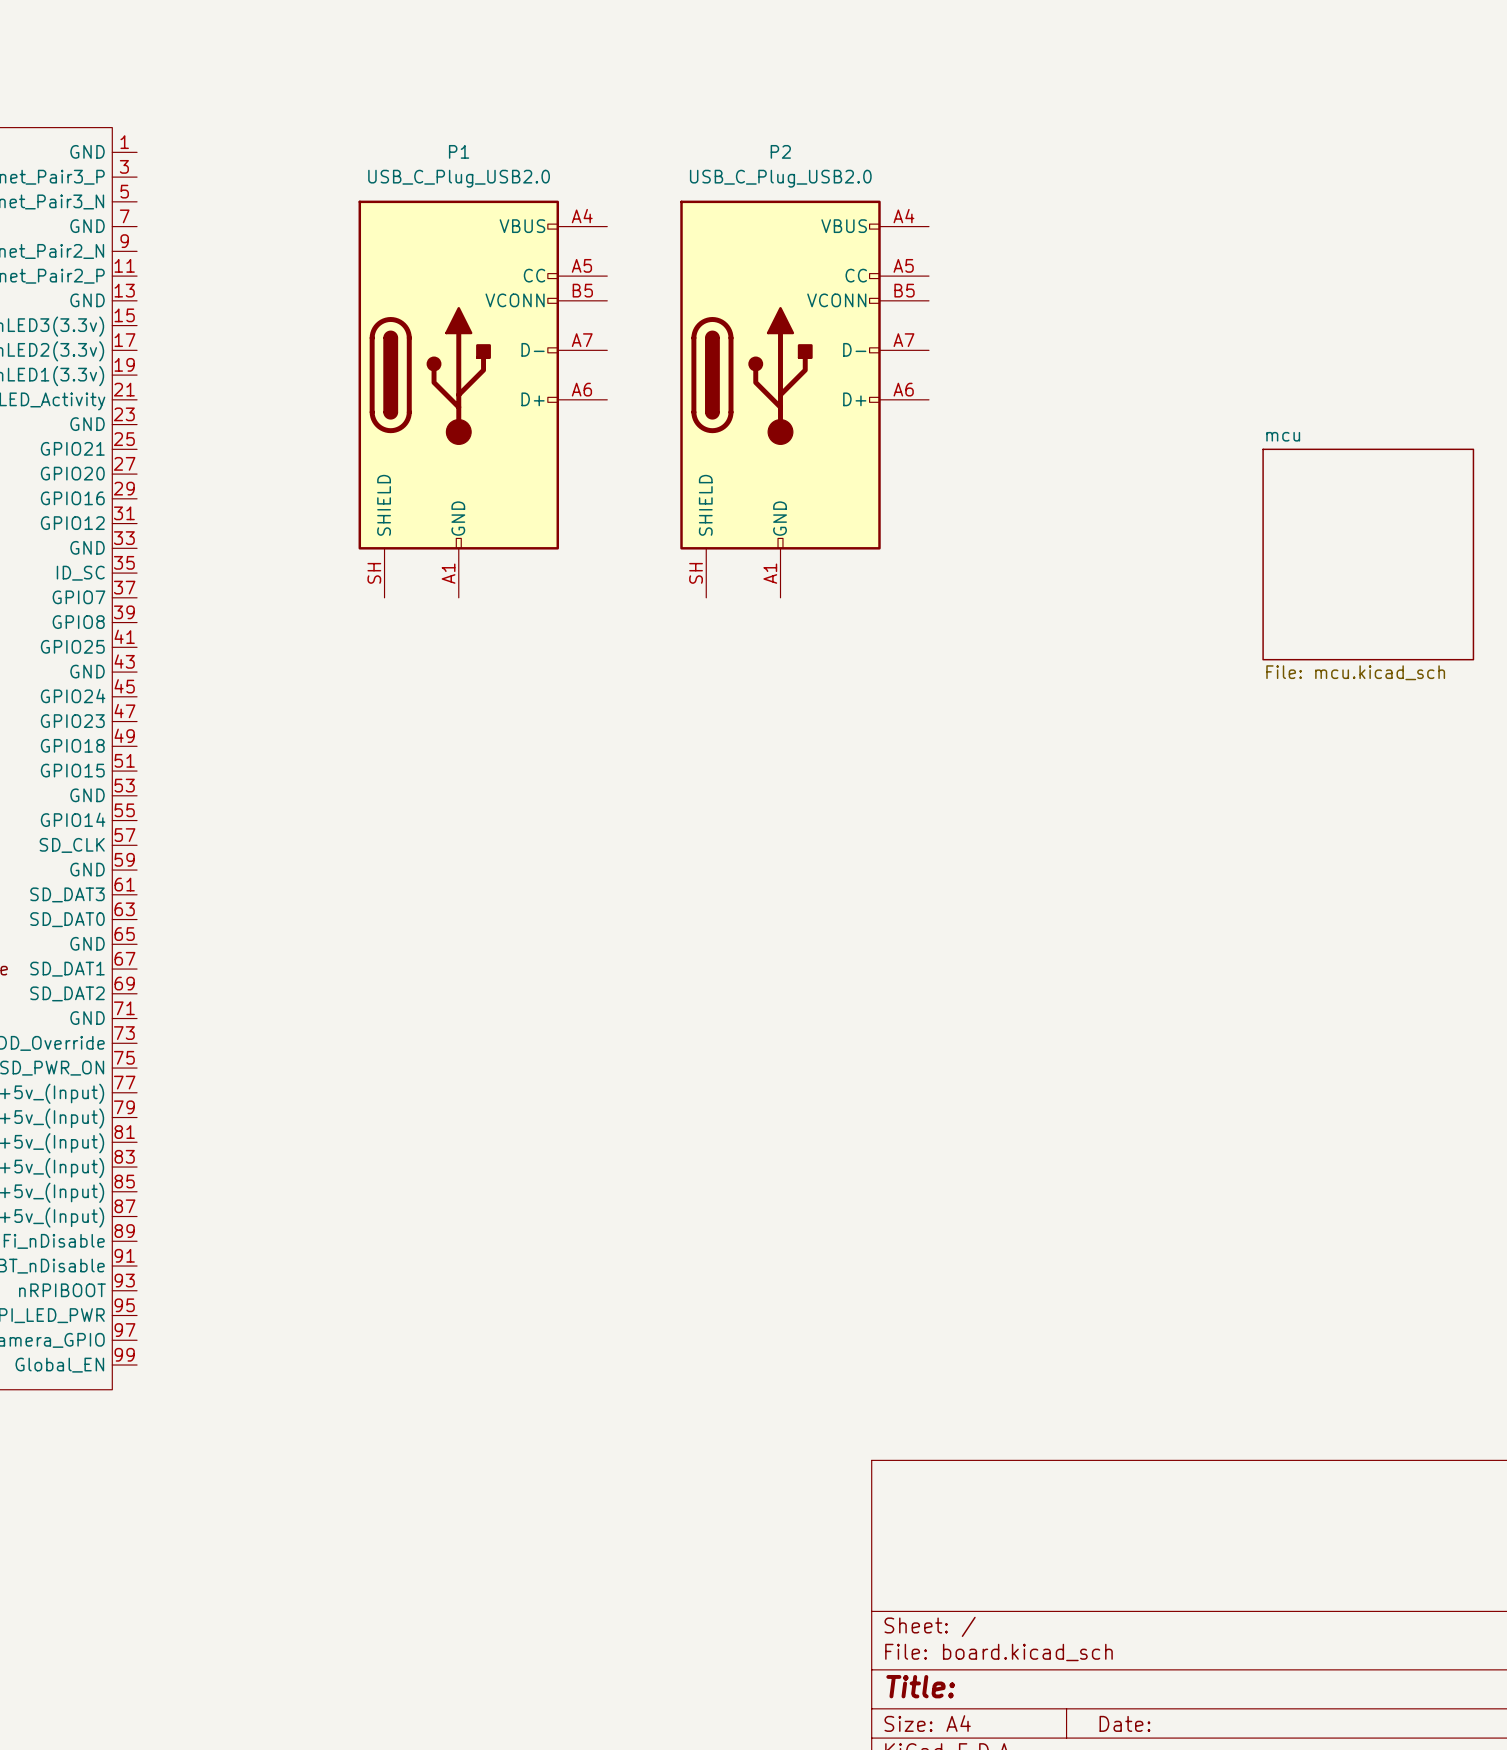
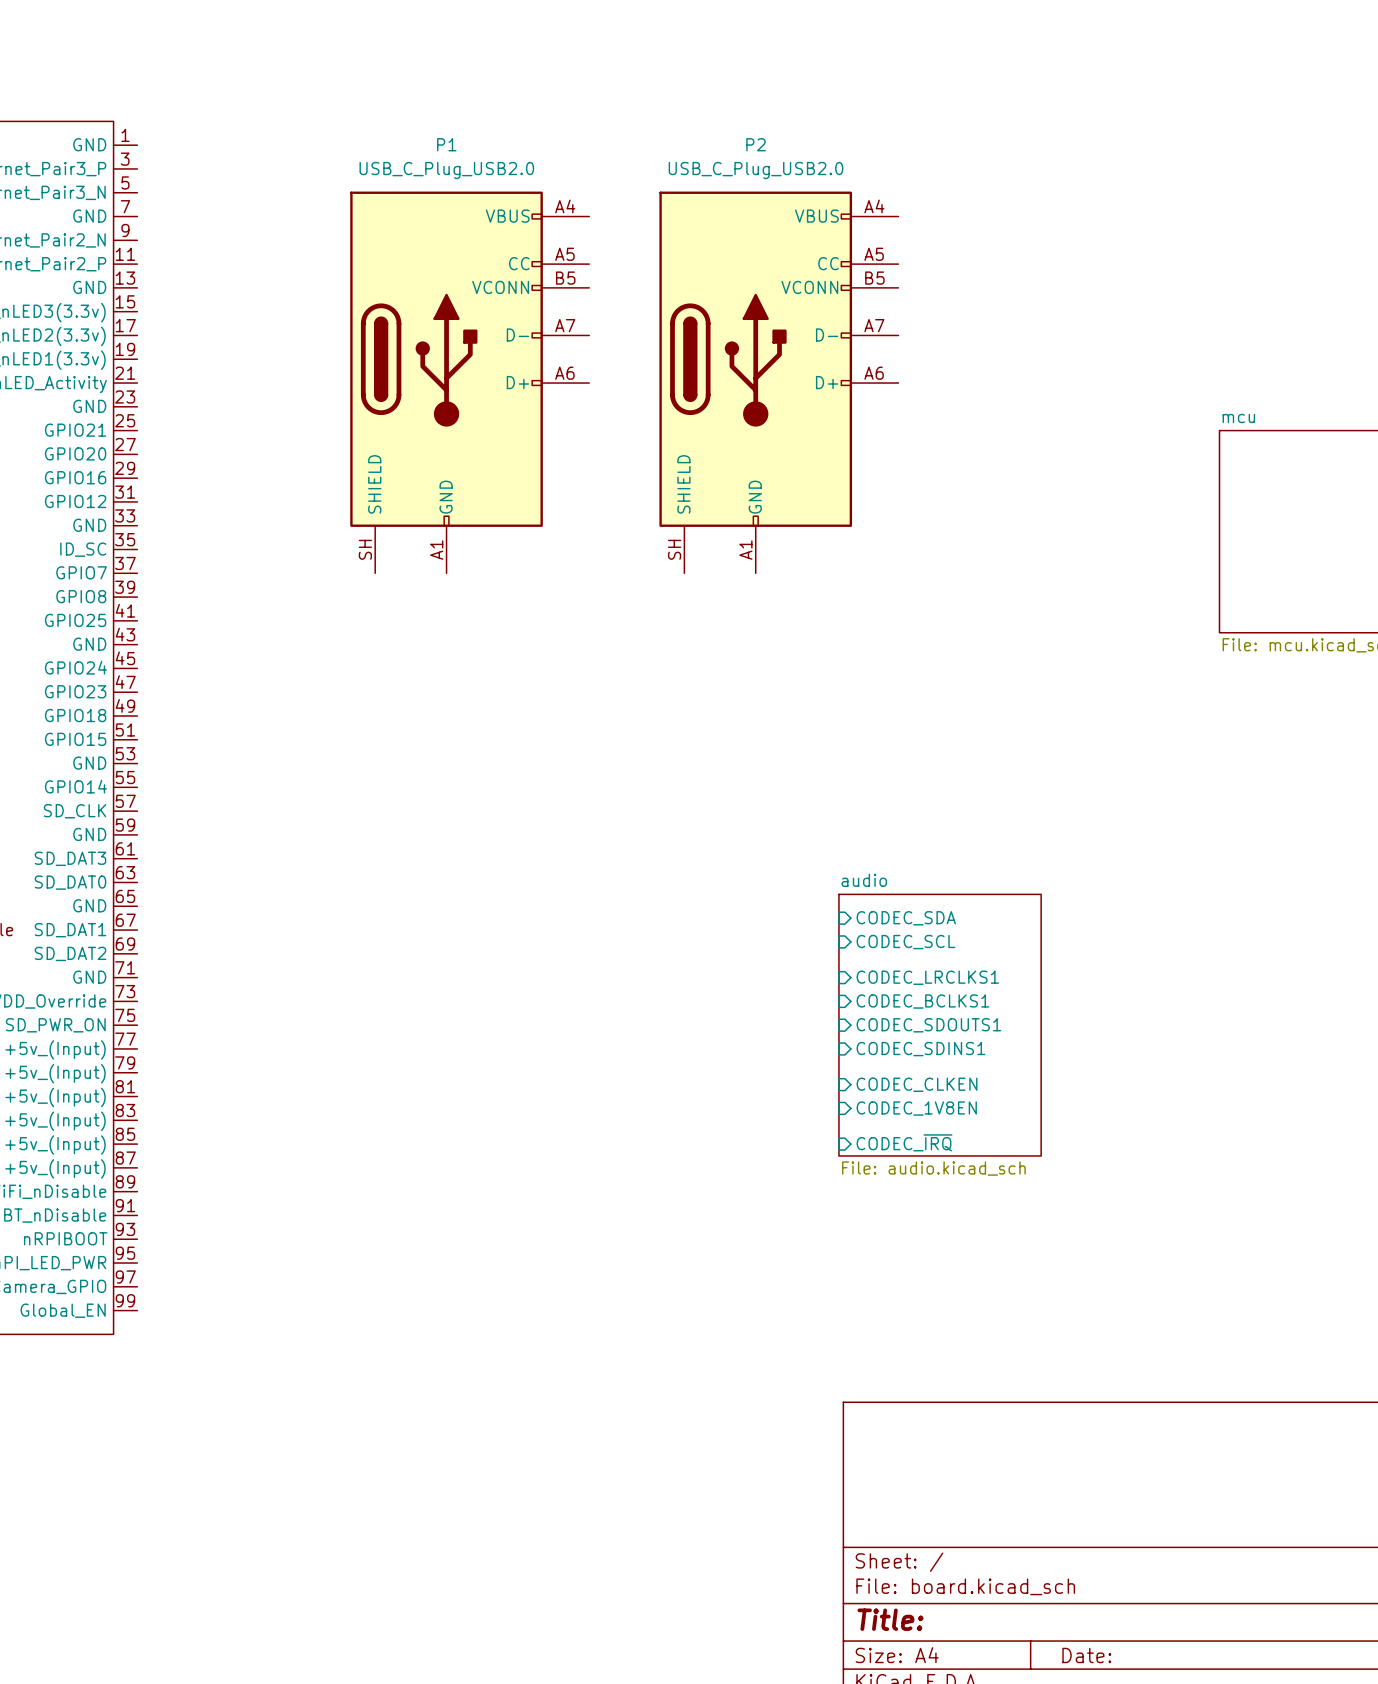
sheet pin: none -> CODEC_SDA (906, 918)
sheet pin: none -> CODEC_SCL (905, 942)
sheet pin: none -> CODEC_LRCLKS1 (927, 977)
sheet pin: none -> CODEC_BCLKS1 (922, 1001)
sheet pin: none -> CODEC_SDOUTS1 (928, 1025)
sheet audio: none -> File: audio.kicad_sch (940, 1025)
sheet pin: none -> CODEC_SDINS1 (920, 1049)
sheet pin: none -> CODEC_CLKEN (917, 1084)
sheet pin: none -> CODEC_1V8EN (916, 1108)
sheet pin: none -> CODEC_~{IRQ} (904, 1142)

